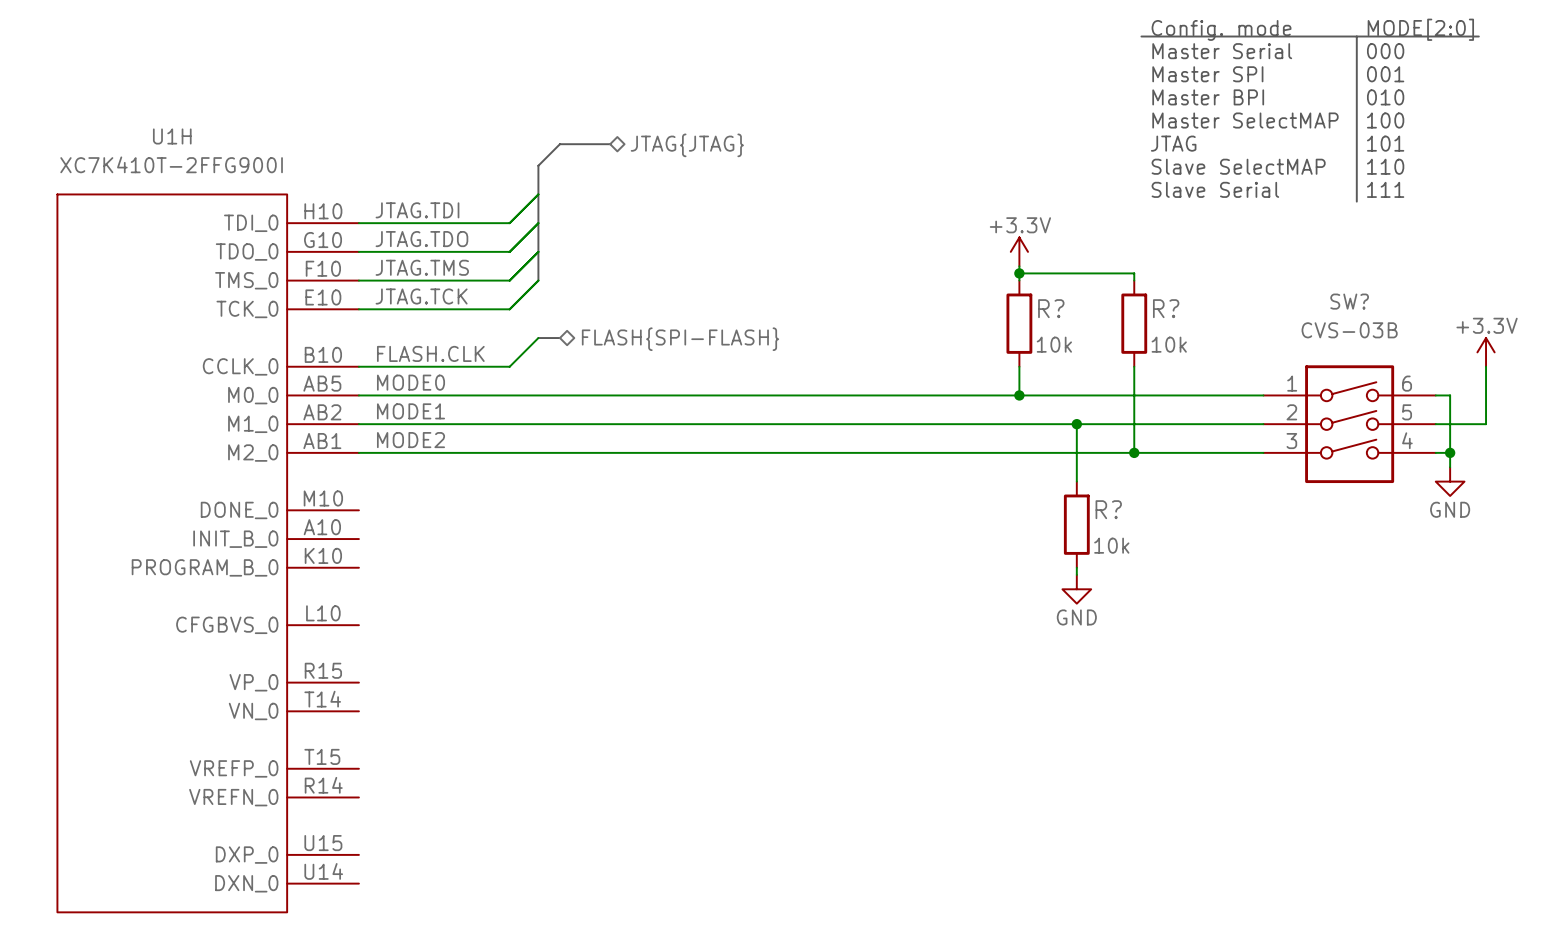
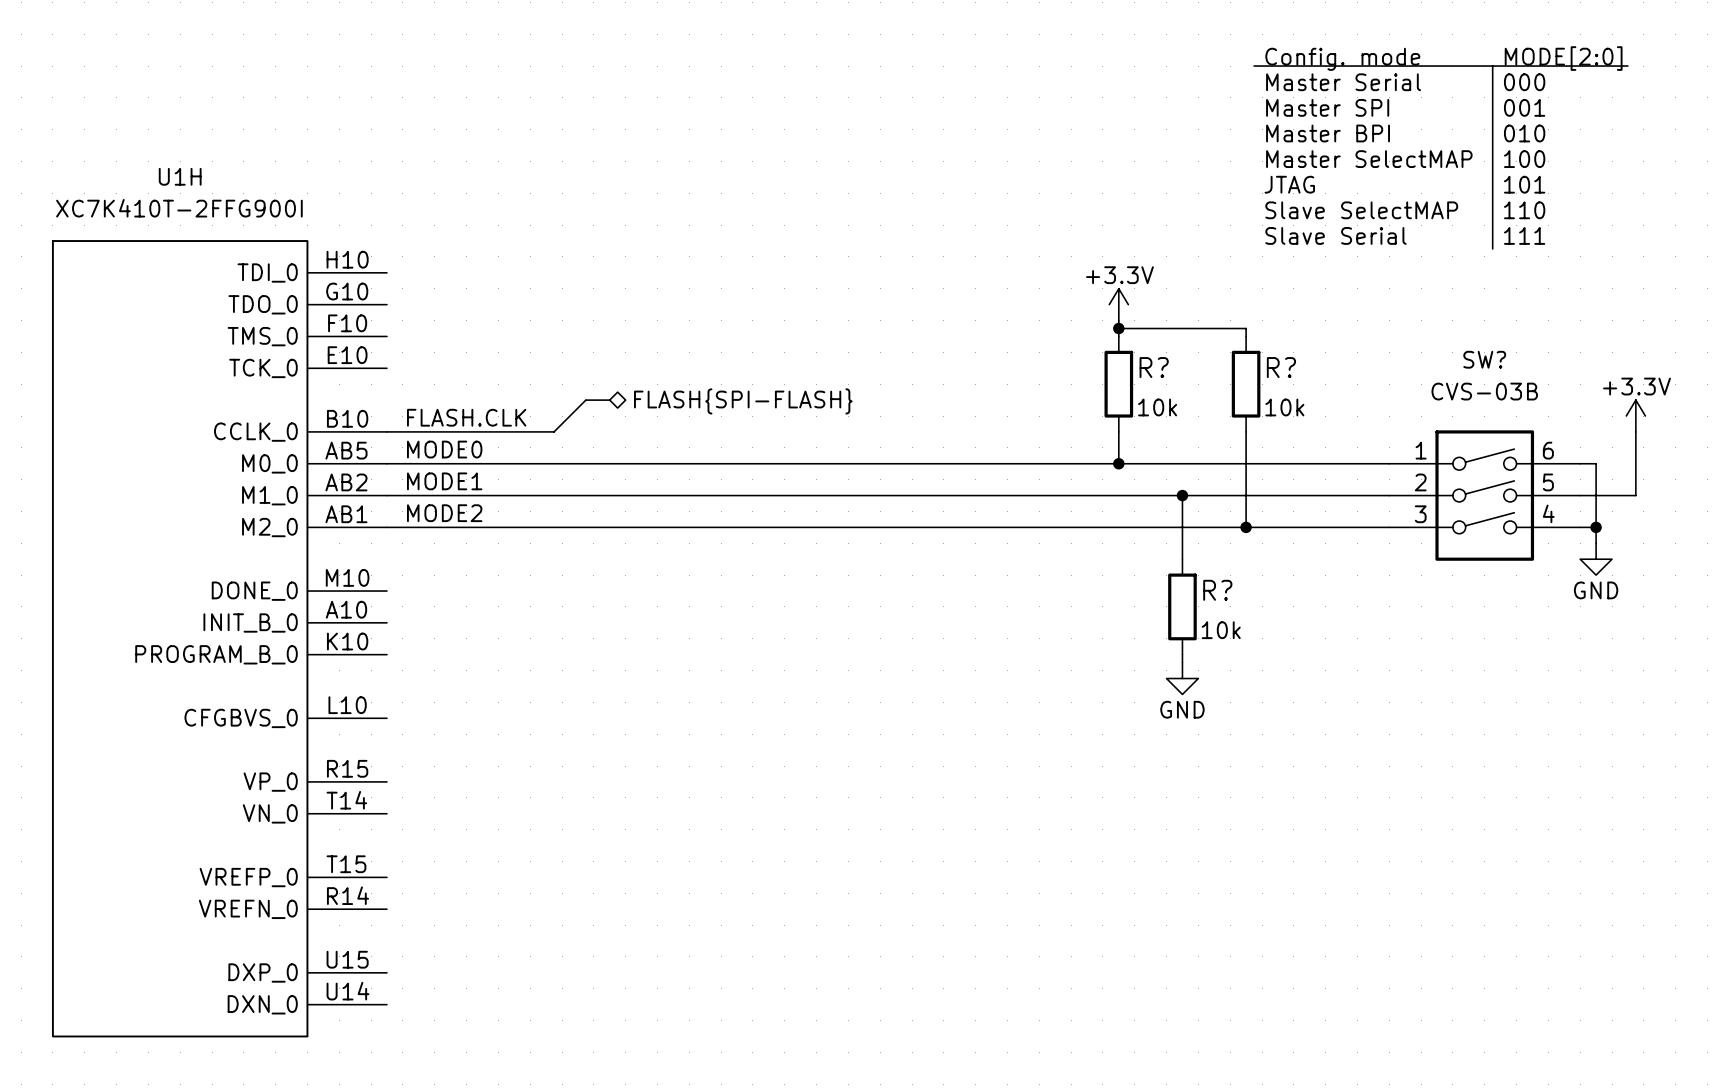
bus: (610, 144) (559, 144) (538, 165) (538, 280) -> none
hierarchical label: JTAG{JTAG} (687, 145) -> none
wire: (538, 194) (509, 223) (358, 223) -> none
label: JTAG.TDI (417, 210) -> none
wire: (538, 223) (509, 251) (358, 251) -> none
label: JTAG.TDO (421, 239) -> none
wire: (538, 251) (509, 280) (358, 280) -> none
label: JTAG.TMS (422, 267) -> none
wire: (538, 280) (509, 309) (358, 309) -> none
label: JTAG.TCK (421, 296) -> none

